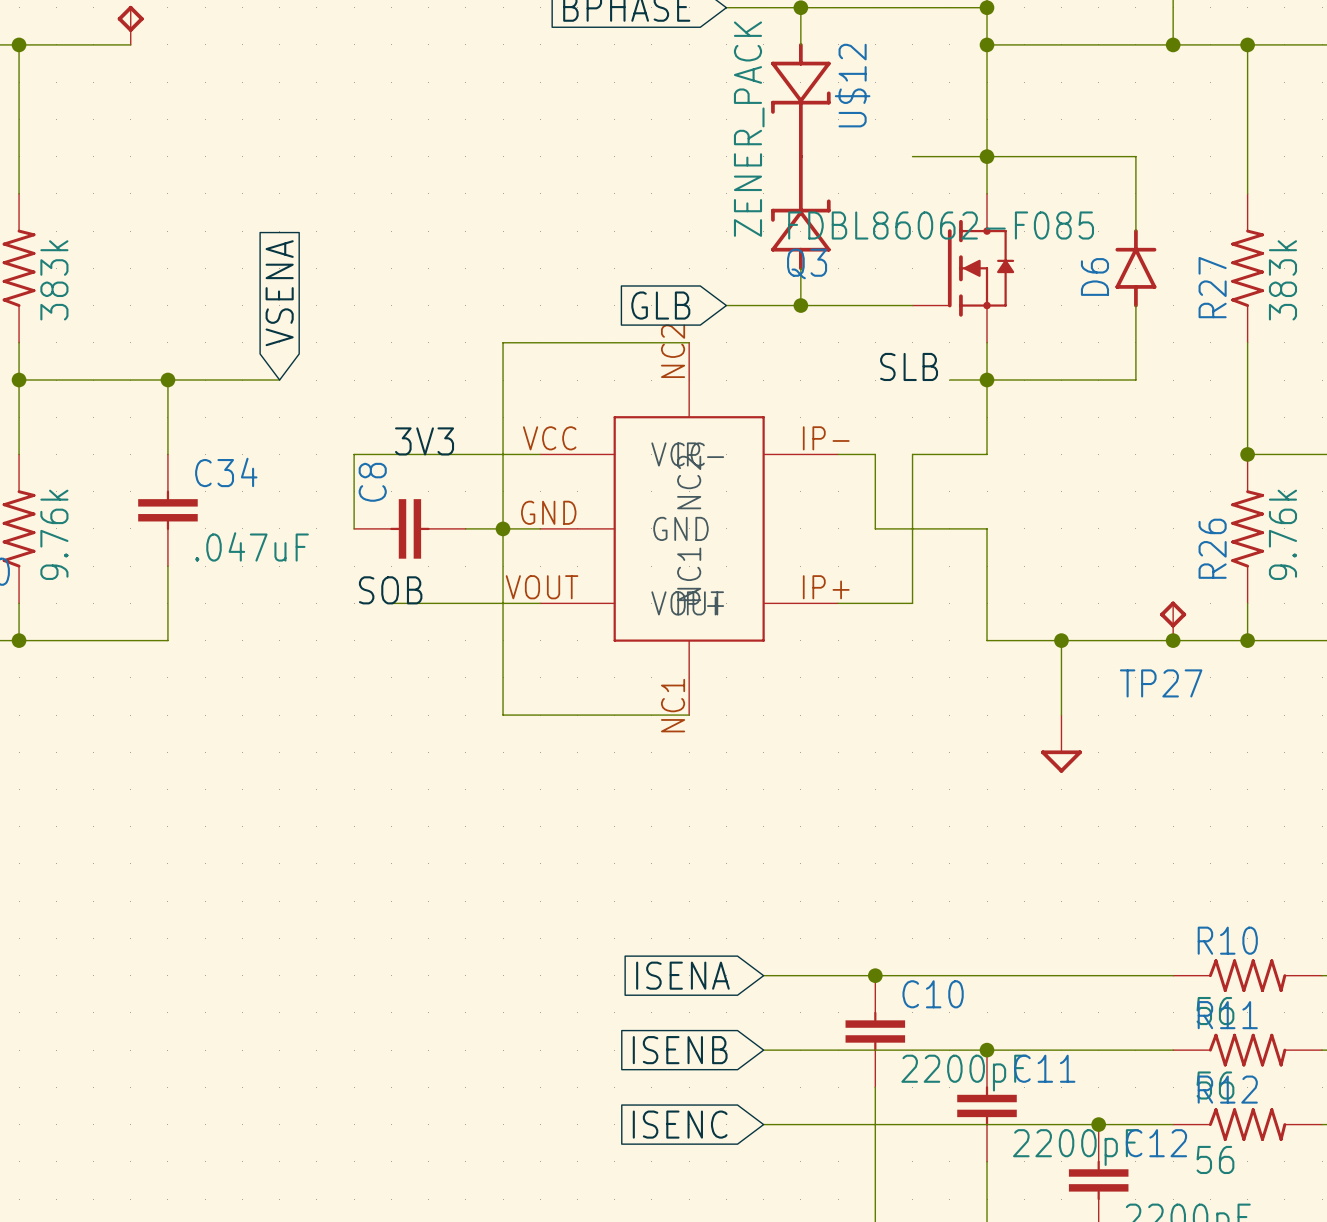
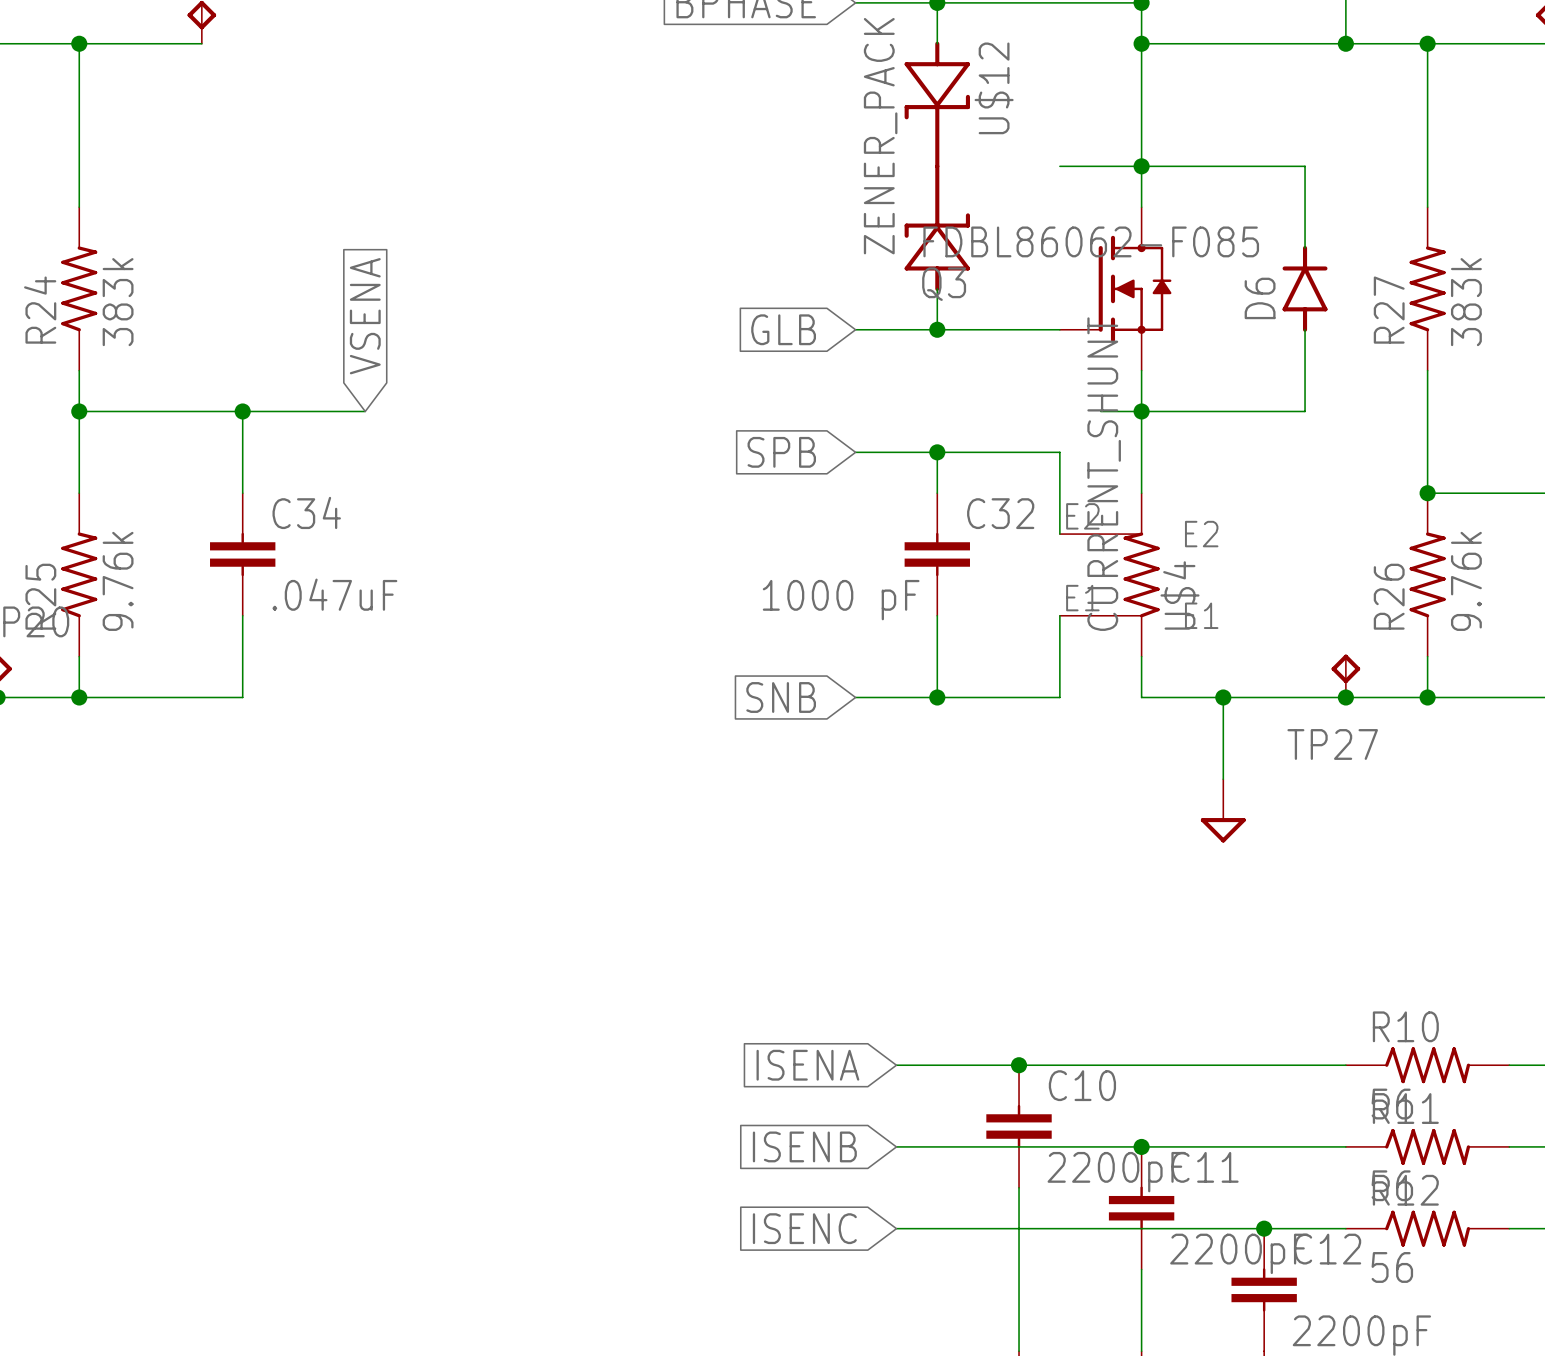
wire: (689, 342) (503, 342) (503, 715) (689, 715) -> none
label: SLB (909, 366) -> none
global label: none -> SPB (781, 452)
wire: none -> (937, 452) (937, 493)
junction: none -> (937, 452)
label: 3V3 (424, 441) -> none
wire: (540, 454) (354, 454) (354, 528) -> none
wire: (838, 454) (875, 454) (875, 528) (987, 528) (987, 603) -> none
wire: (912, 454) (987, 454) -> (1059, 493) (1059, 452) (855, 452)
wire: (912, 491) (912, 566) -> (937, 615) (937, 697)
C32: none -> 1000 pF (937, 554)
C8: (409, 528) -> none
wire: (465, 528) (540, 528) -> none
junction: (503, 528) -> none
part: (689, 528) -> none
U$4: none -> CURRENT_SHUNT (1109, 574)
label: SOB (390, 590) -> none
wire: (391, 603) (540, 603) -> none
wire: (838, 603) (912, 603) -> (855, 697) (1059, 697) (1059, 656)
global label: none -> SNB (781, 697)
junction: none -> (937, 697)

